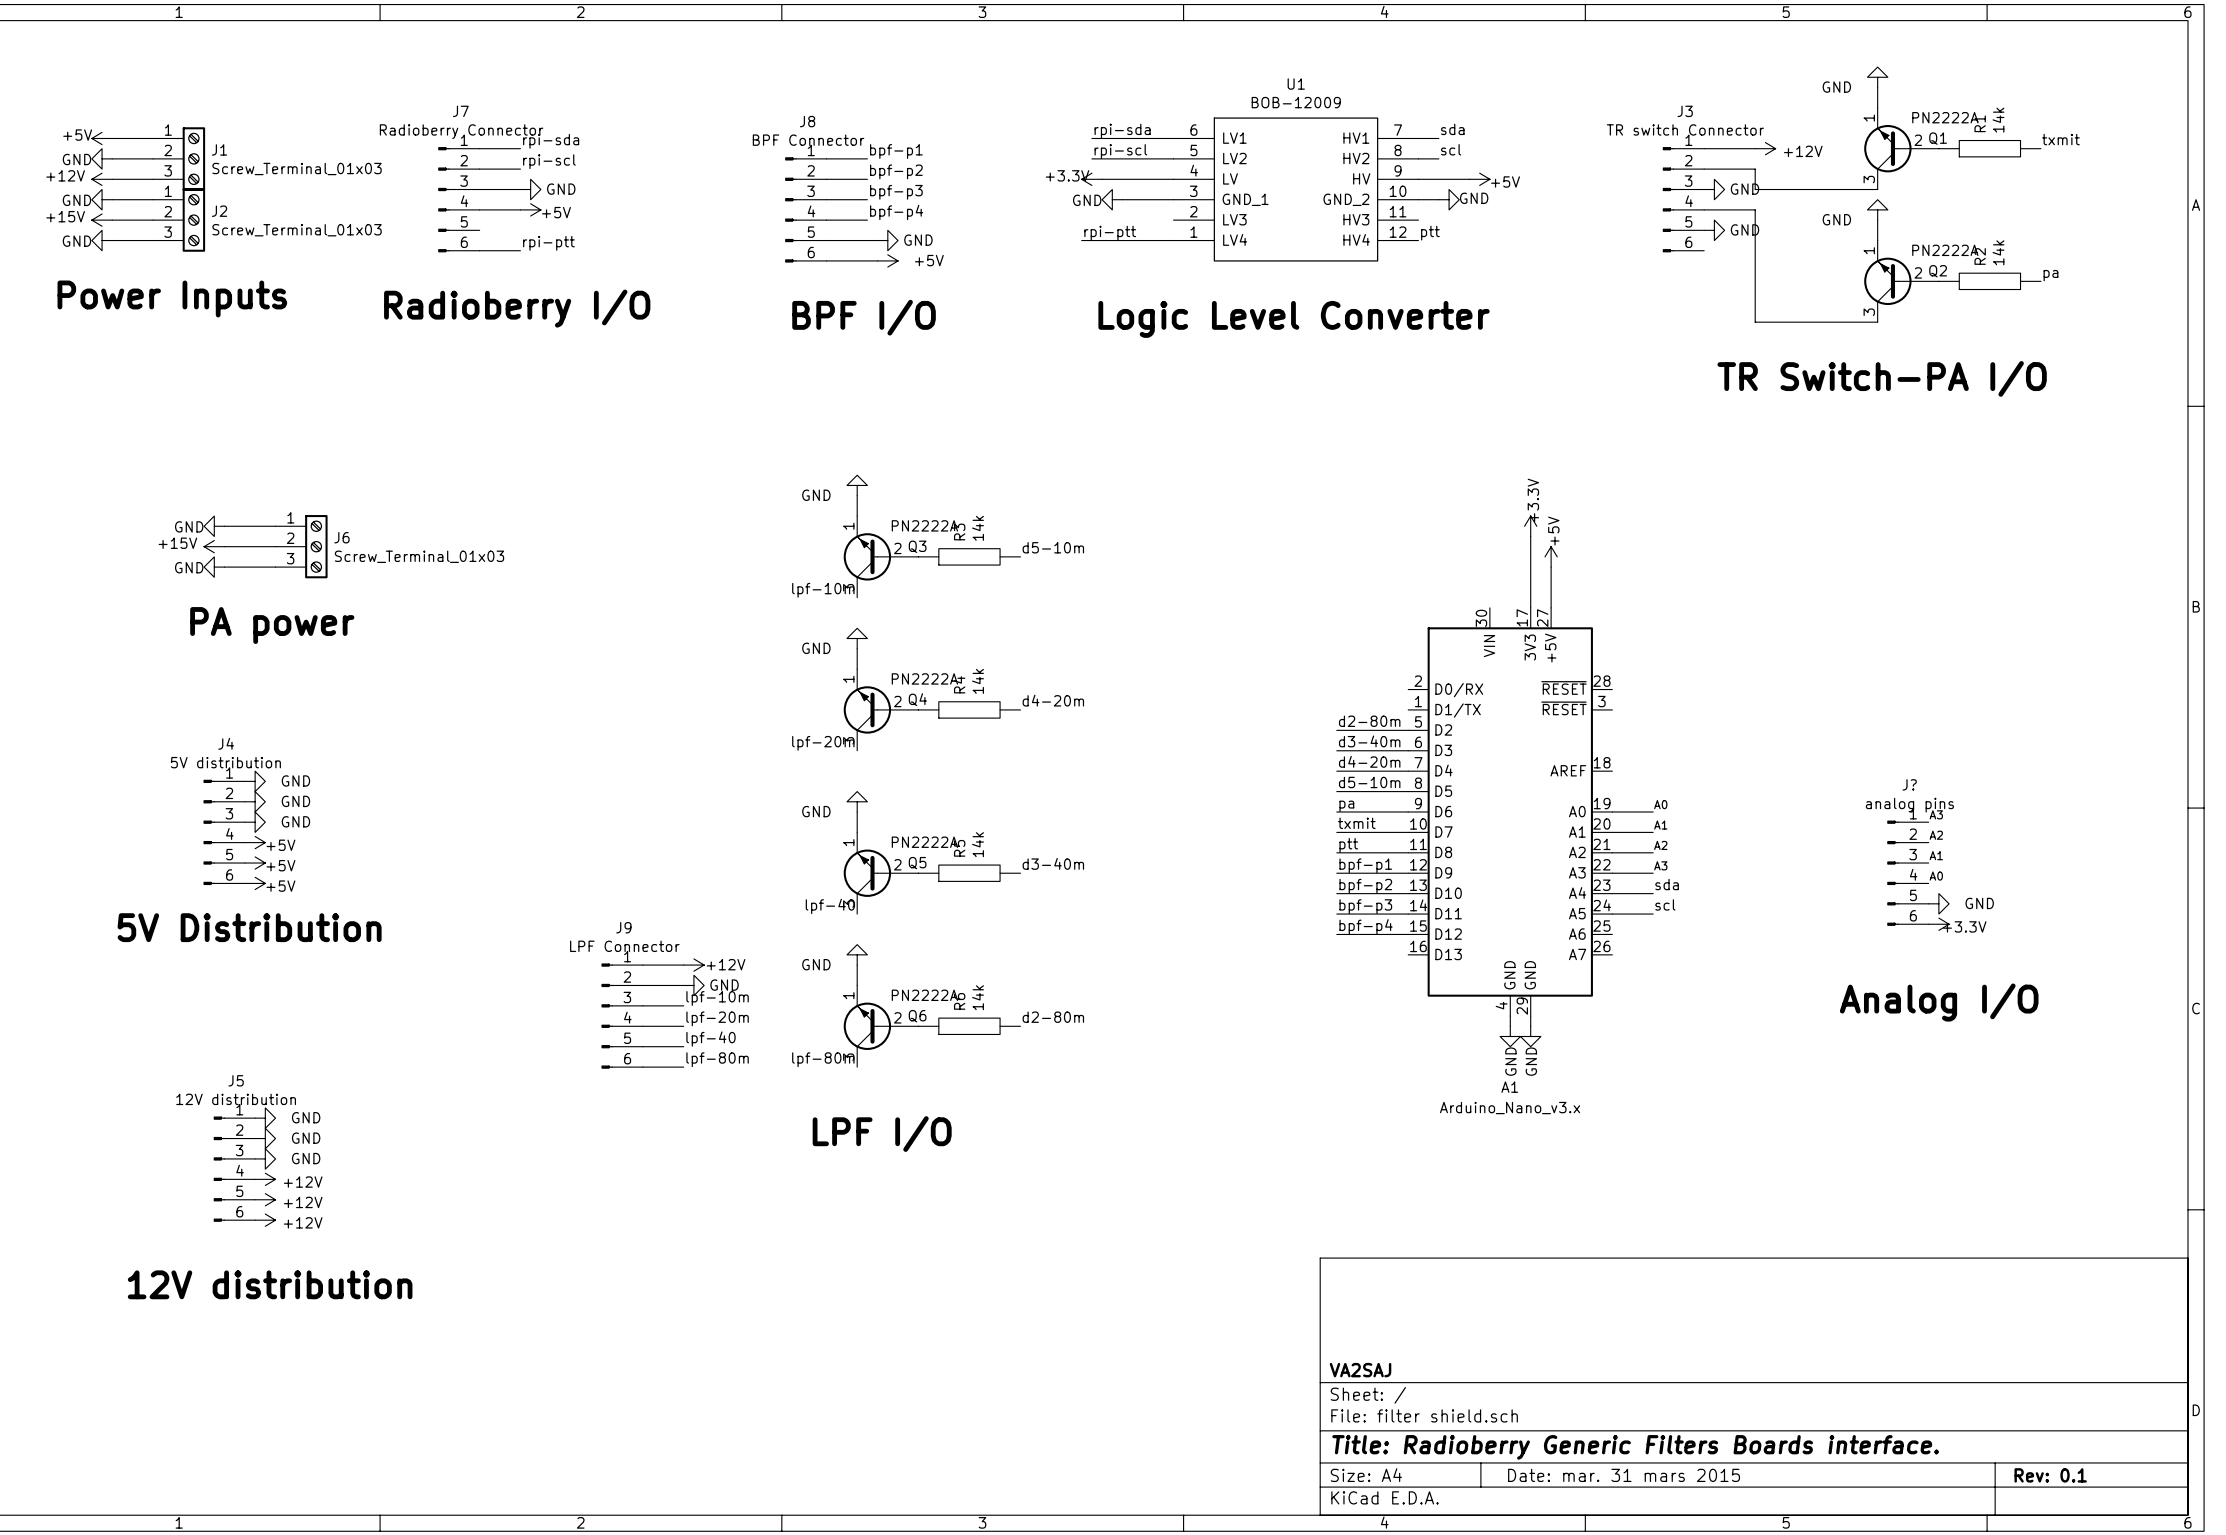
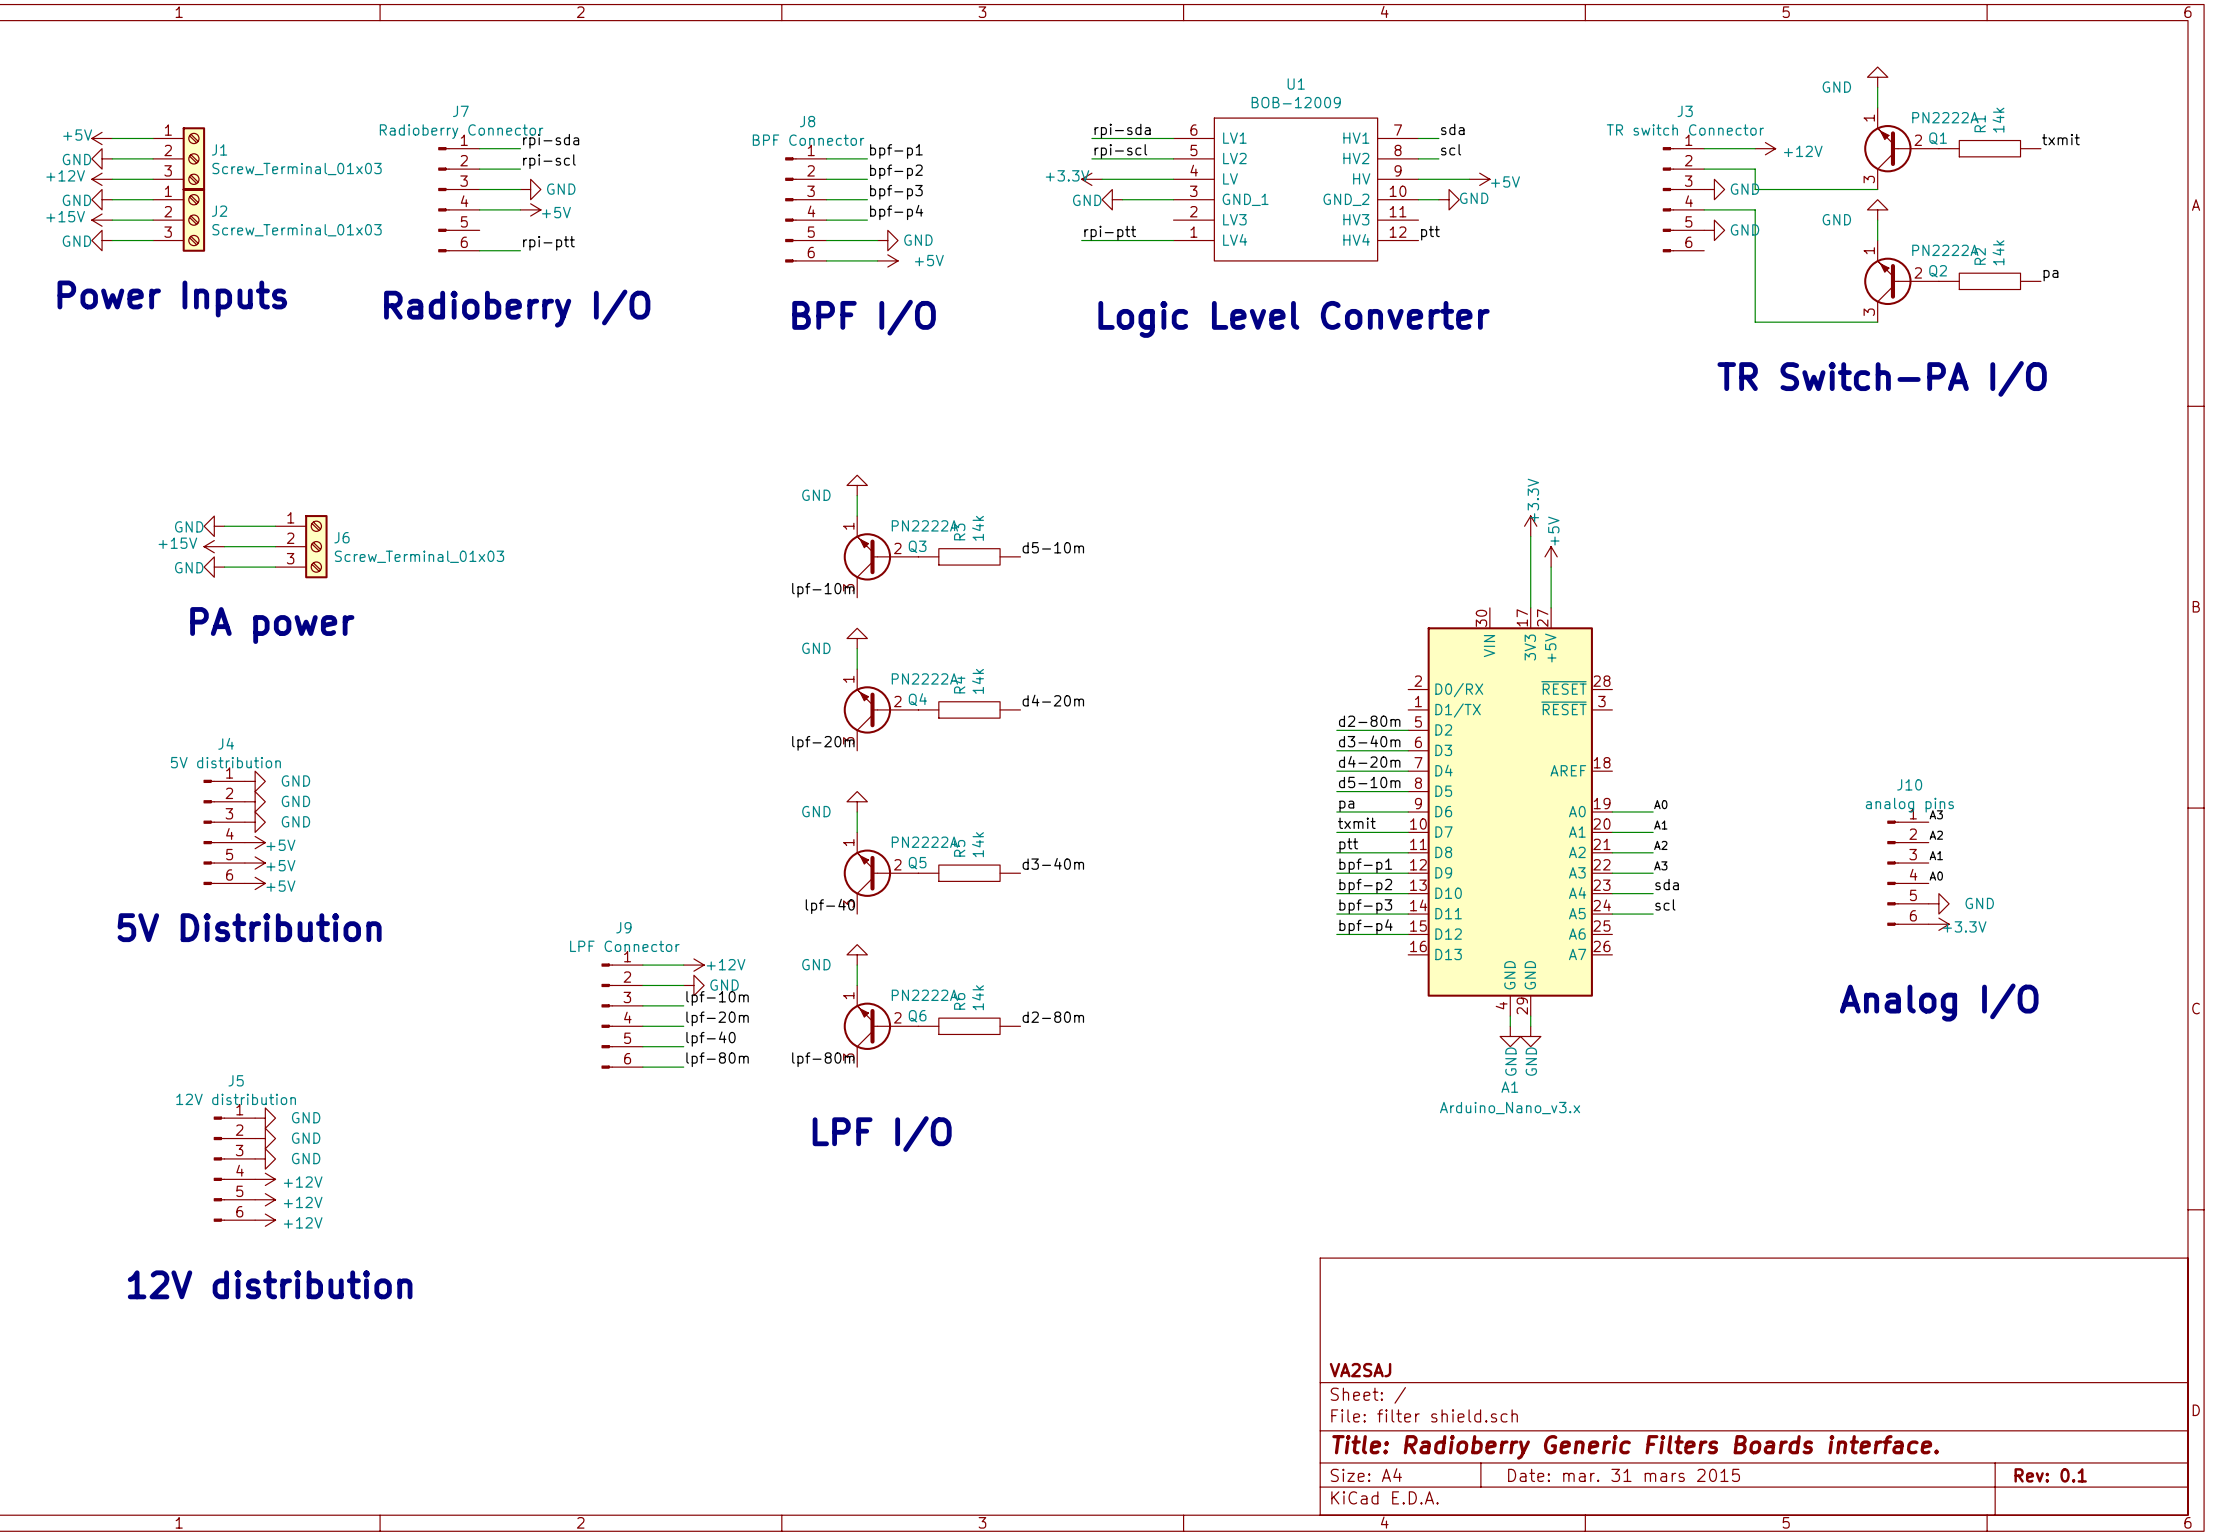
J? name: J? (1909, 784) -> J10 (1909, 784)

